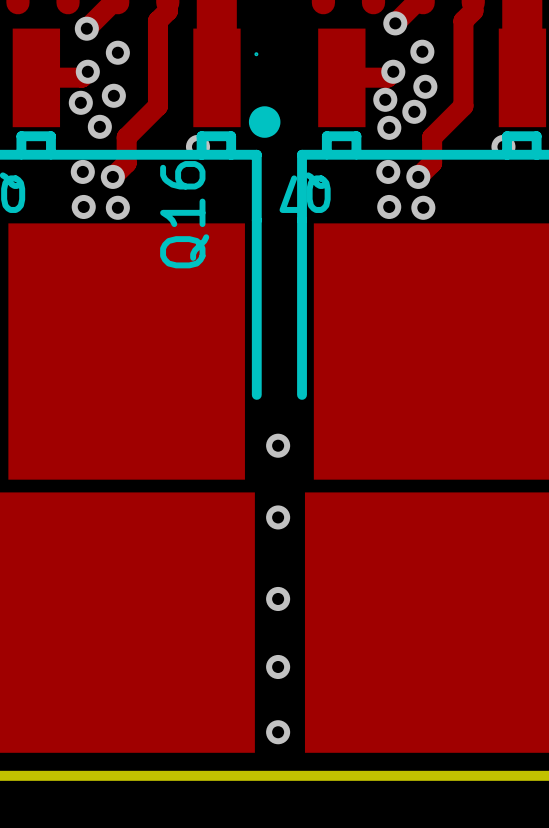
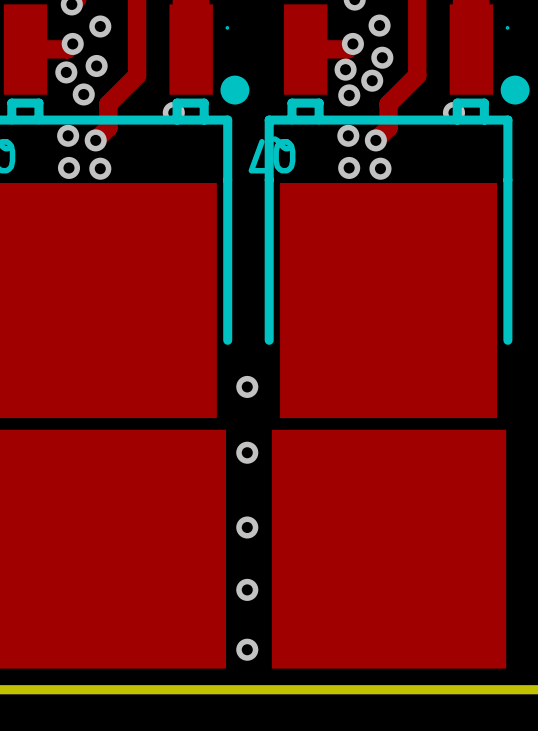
Q16 name: Q16 (184, 214) -> none

